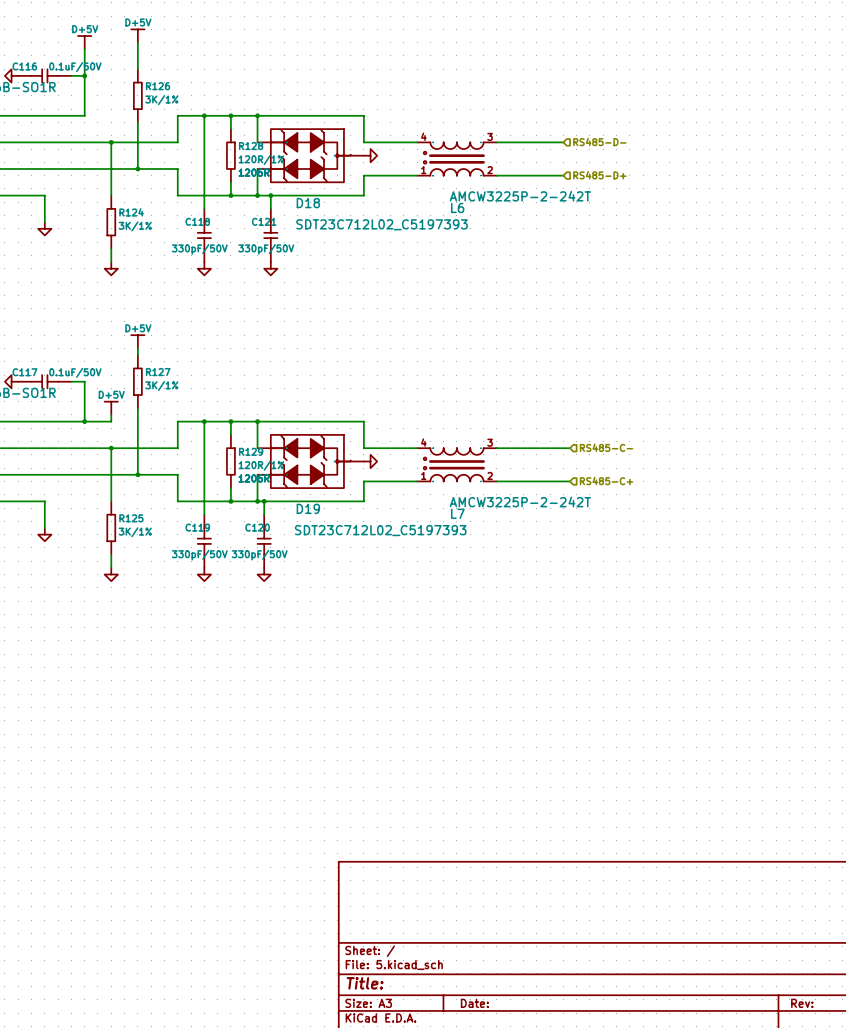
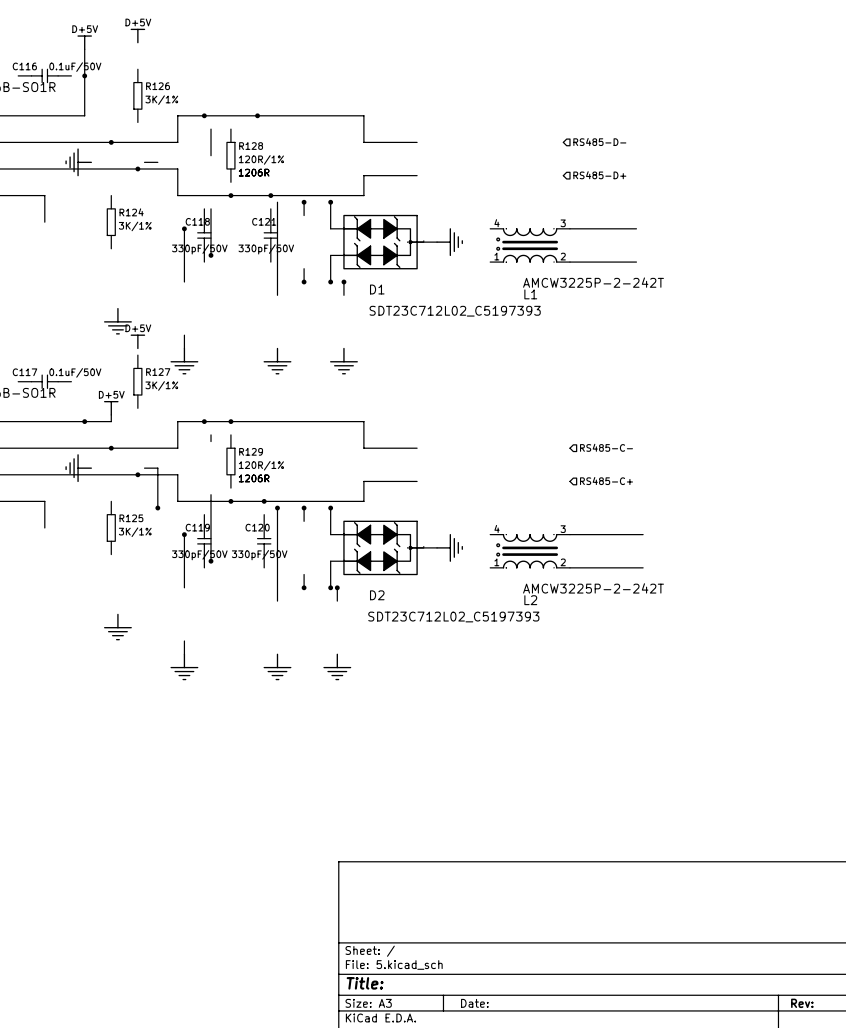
wire: (137, 42) (137, 69) -> (211, 129) (211, 155)
power symbol: (11, 75) -> none
wire: (71, 75) (84, 75) -> (144, 162) (157, 162)
wire: (204, 115) (204, 208) -> (277, 202) (277, 295)
wire: (230, 115) (230, 129) -> (304, 202) (304, 215)
junction: (230, 115) -> none
wire: (257, 115) (257, 142) -> (330, 202) (330, 228)
wire: (137, 122) (137, 168) -> (211, 208) (211, 255)
wire: (111, 142) (111, 195) -> (184, 228) (184, 282)
wire: (496, 142) (563, 142) -> (569, 228) (636, 228)
D18: SDT23C712L02_C5197393 (310, 155) -> none
power symbol: (370, 155) -> none
L6: AMCW3225P-2-242T (456, 159) -> none
power symbol: none -> (78, 162)
wire: (257, 168) (257, 195) -> (330, 255) (330, 282)
wire: (496, 175) (563, 175) -> (569, 262) (636, 262)
wire: (230, 182) (230, 195) -> (304, 268) (304, 282)
junction: (257, 195) -> none
wire: (270, 195) (270, 208) -> (343, 282) (343, 295)
junction: none -> (304, 202)
junction: none -> (330, 202)
power symbol: (44, 228) -> none
junction: none -> (184, 228)
D1: none -> SDT23C712L02_C5197393 (383, 242)
power symbol: none -> (449, 242)
L1: none -> AMCW3225P-2-242T (530, 245)
wire: (111, 248) (111, 262) -> (184, 335) (184, 348)
junction: none -> (211, 255)
power symbol: (111, 268) -> none
power symbol: (204, 268) -> none
power symbol: (270, 268) -> none
junction: none -> (304, 282)
junction: none -> (330, 282)
junction: none -> (343, 282)
power symbol: none -> (117, 321)
wire: (137, 348) (137, 355) -> (211, 434) (211, 441)
power symbol: none -> (184, 361)
power symbol: none -> (277, 361)
power symbol: none -> (343, 361)
power symbol: (11, 381) -> none
wire: (71, 381) (84, 381) (84, 421) -> (144, 468) (157, 468) (157, 508)
wire: (137, 408) (137, 474) -> (211, 494) (211, 561)
wire: (204, 421) (204, 514) -> (277, 508) (277, 601)
wire: (230, 421) (230, 434) -> (304, 508) (304, 521)
wire: (257, 421) (257, 448) -> (330, 508) (330, 534)
junction: (257, 421) -> none
wire: (111, 448) (111, 501) -> (184, 534) (184, 587)
wire: (496, 448) (569, 448) -> (569, 534) (643, 534)
D19: SDT23C712L02_C5197393 (310, 461) -> none
power symbol: (370, 461) -> none
L7: AMCW3225P-2-242T (456, 464) -> none
power symbol: none -> (78, 468)
wire: (257, 474) (257, 501) -> (330, 561) (330, 587)
wire: (496, 481) (569, 481) -> (569, 567) (643, 567)
wire: (230, 488) (230, 501) -> (304, 574) (304, 587)
junction position: (257, 501) -> (277, 508)
wire: (264, 501) (264, 514) -> (337, 587) (337, 601)
junction: none -> (157, 508)
junction: none -> (304, 508)
junction: none -> (330, 508)
power symbol: (44, 534) -> none
junction: none -> (184, 534)
D2: none -> SDT23C712L02_C5197393 (383, 547)
power symbol: none -> (449, 547)
L2: none -> AMCW3225P-2-242T (530, 551)
wire: (111, 554) (111, 567) -> (184, 640) (184, 654)
junction: none -> (211, 561)
power symbol: (111, 574) -> none
power symbol: (204, 574) -> none
power symbol: (264, 574) -> none
junction: none -> (304, 587)
junction: none -> (330, 587)
junction: none -> (337, 587)
power symbol: none -> (117, 627)
power symbol: none -> (184, 666)
power symbol: none -> (277, 666)
power symbol: none -> (337, 666)

